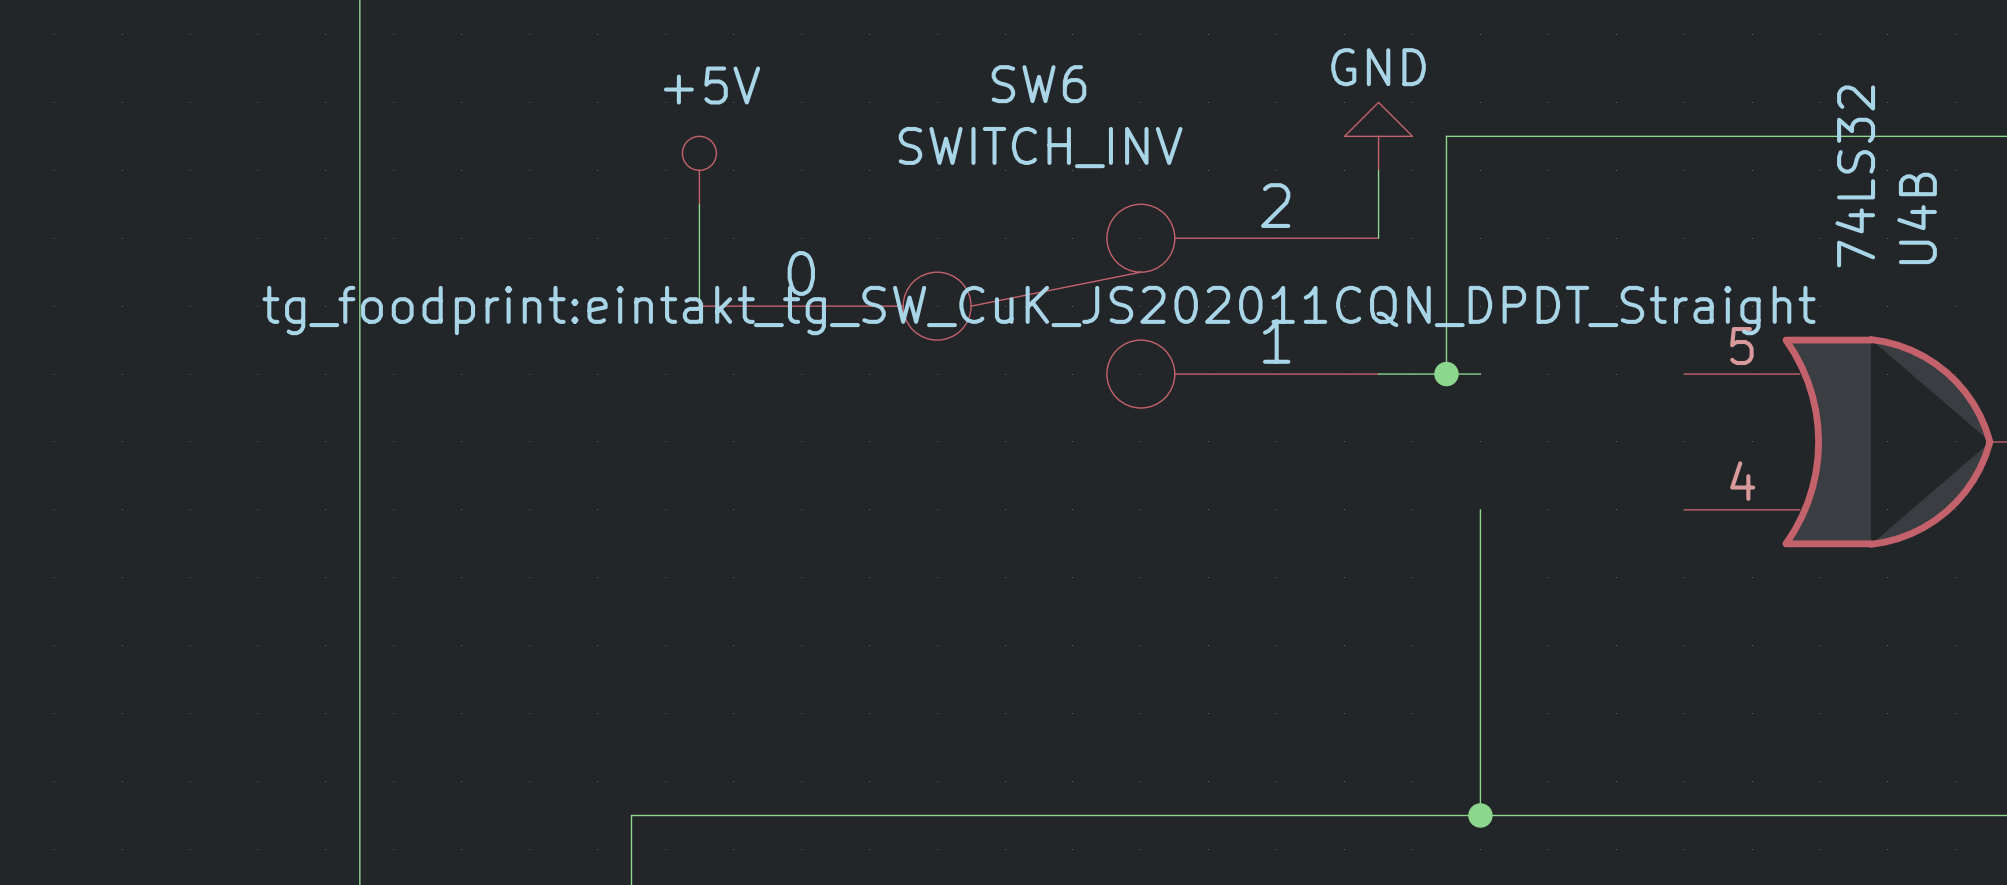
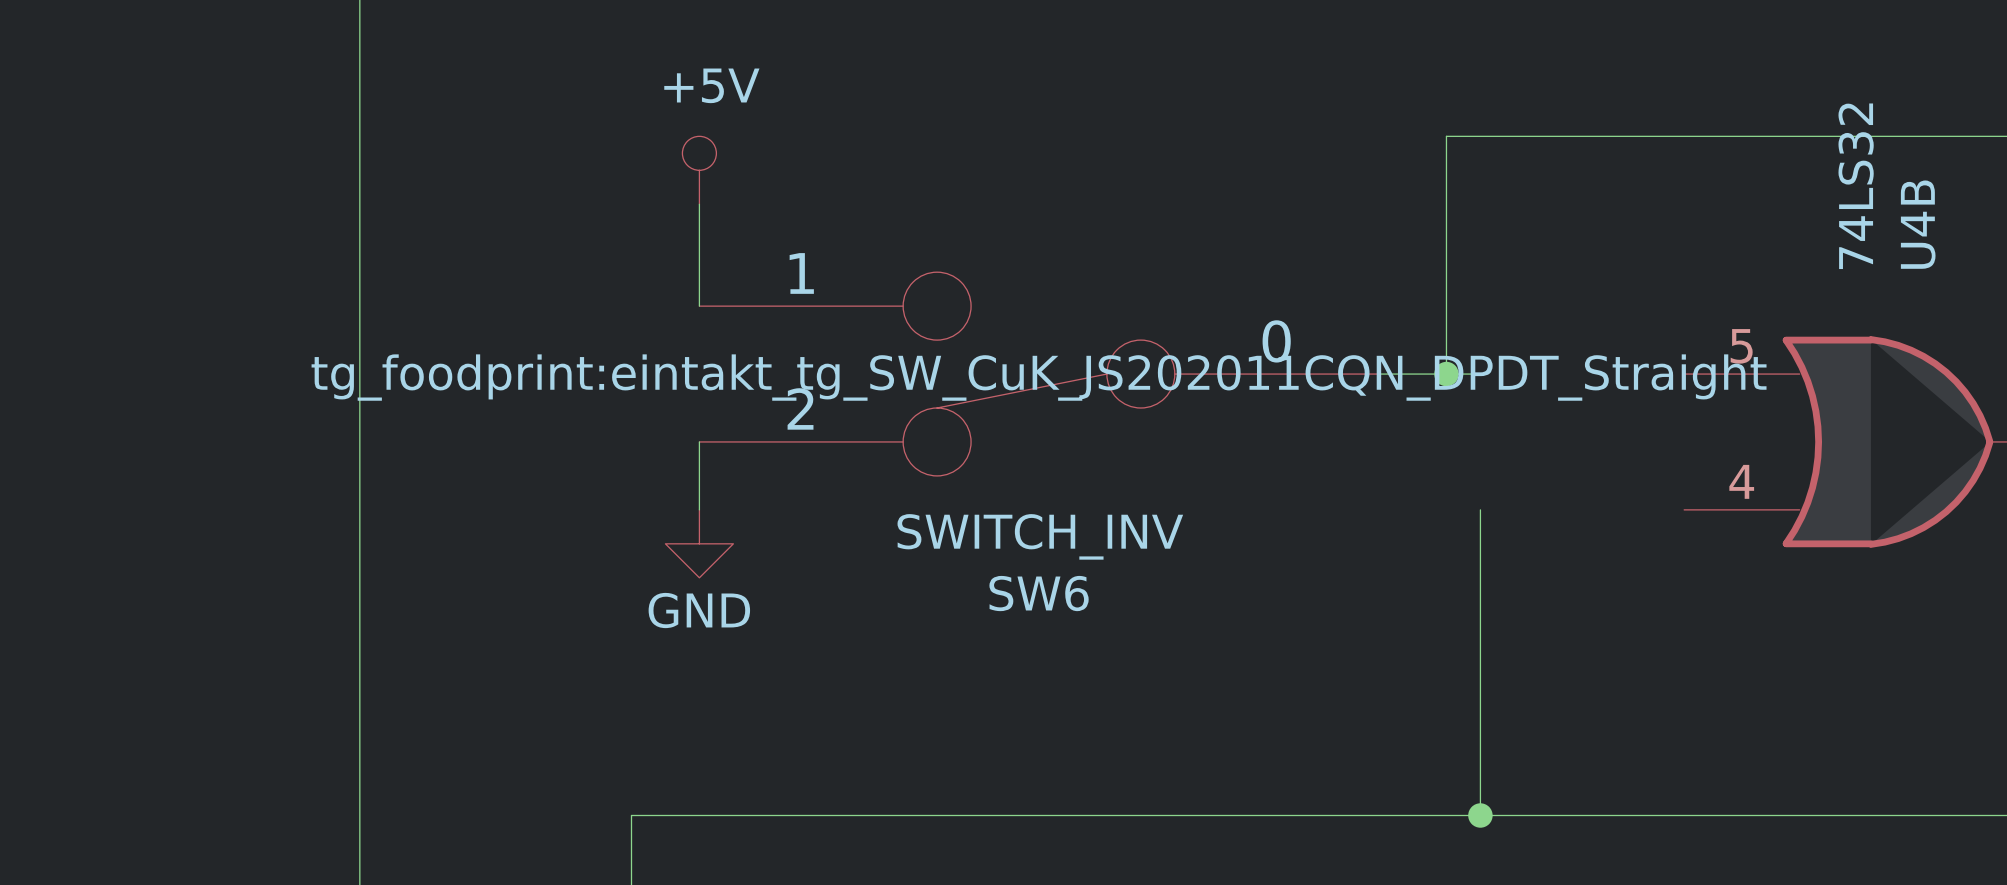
power symbol: GND (1378, 136) -> none
wire: (1378, 170) (1378, 238) -> none
SW6 rotation: 0° (1038, 306) -> 180° (1038, 374)
wire: none -> (699, 441) (699, 509)
power symbol: none -> GND (699, 543)

